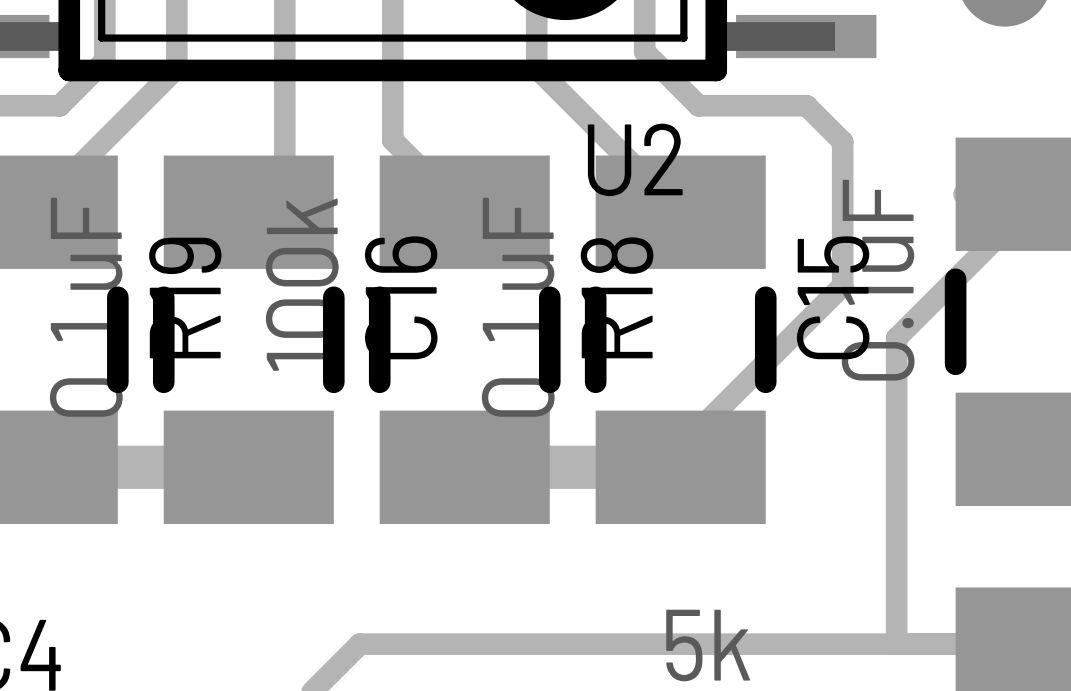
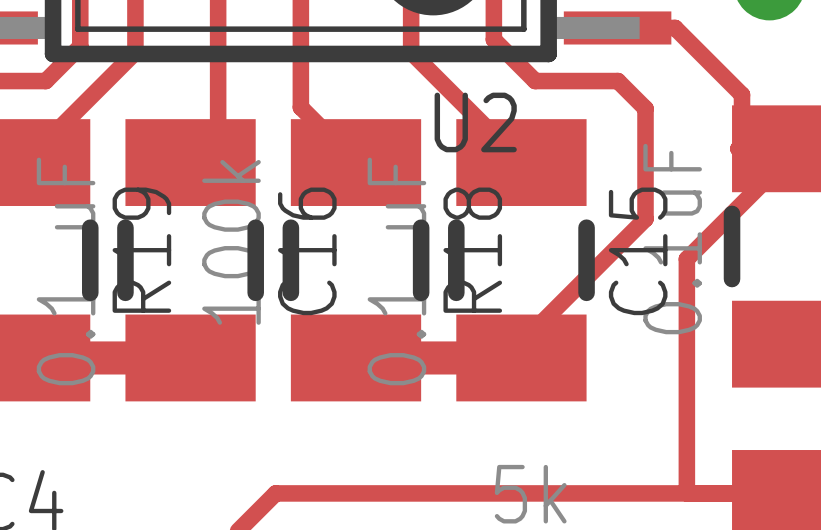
track: none -> (617, 27) (675, 27) (742, 94) (742, 145) (738, 148)

